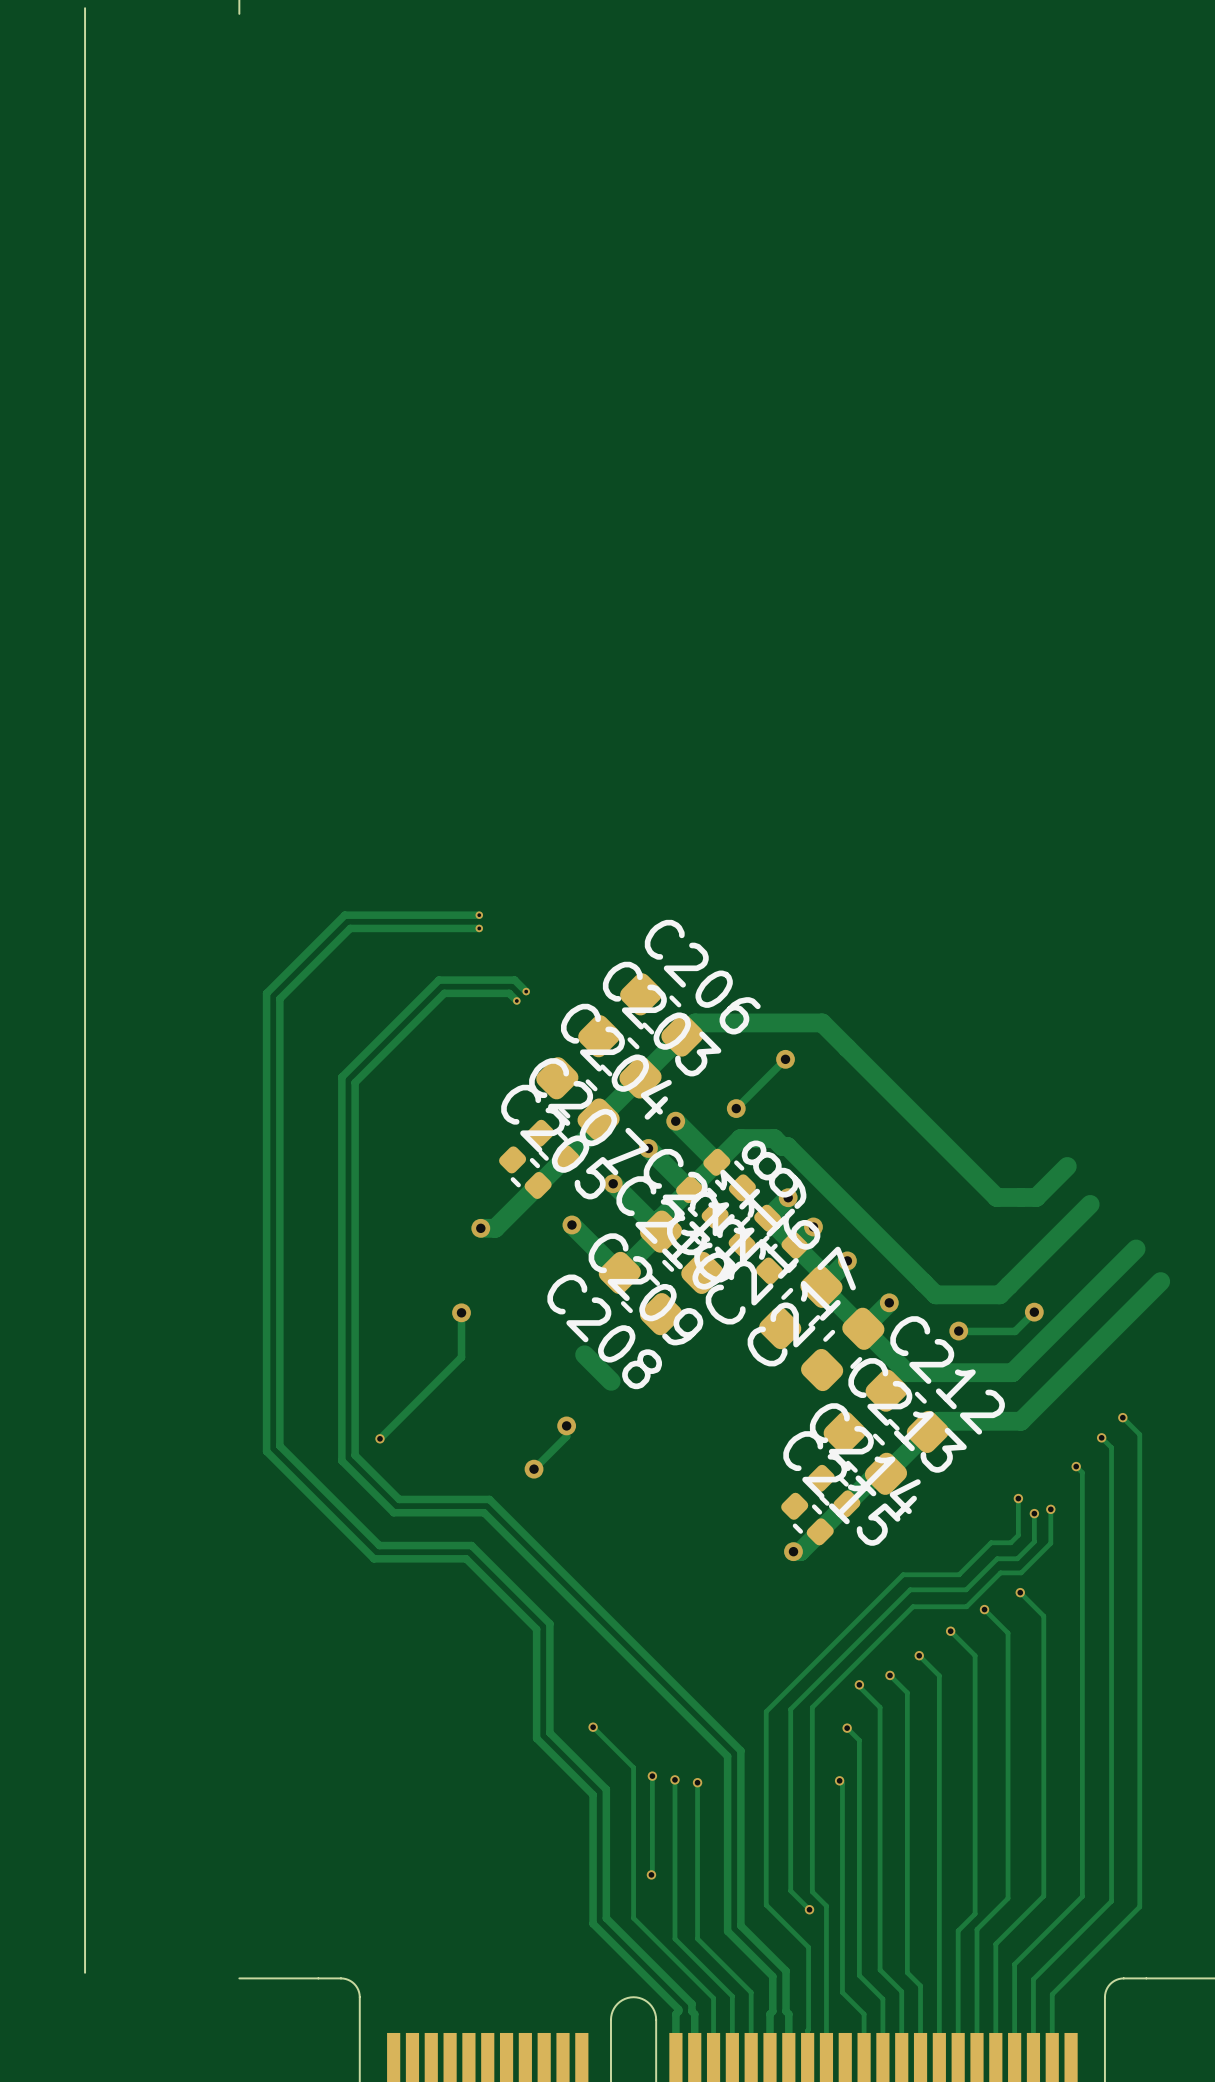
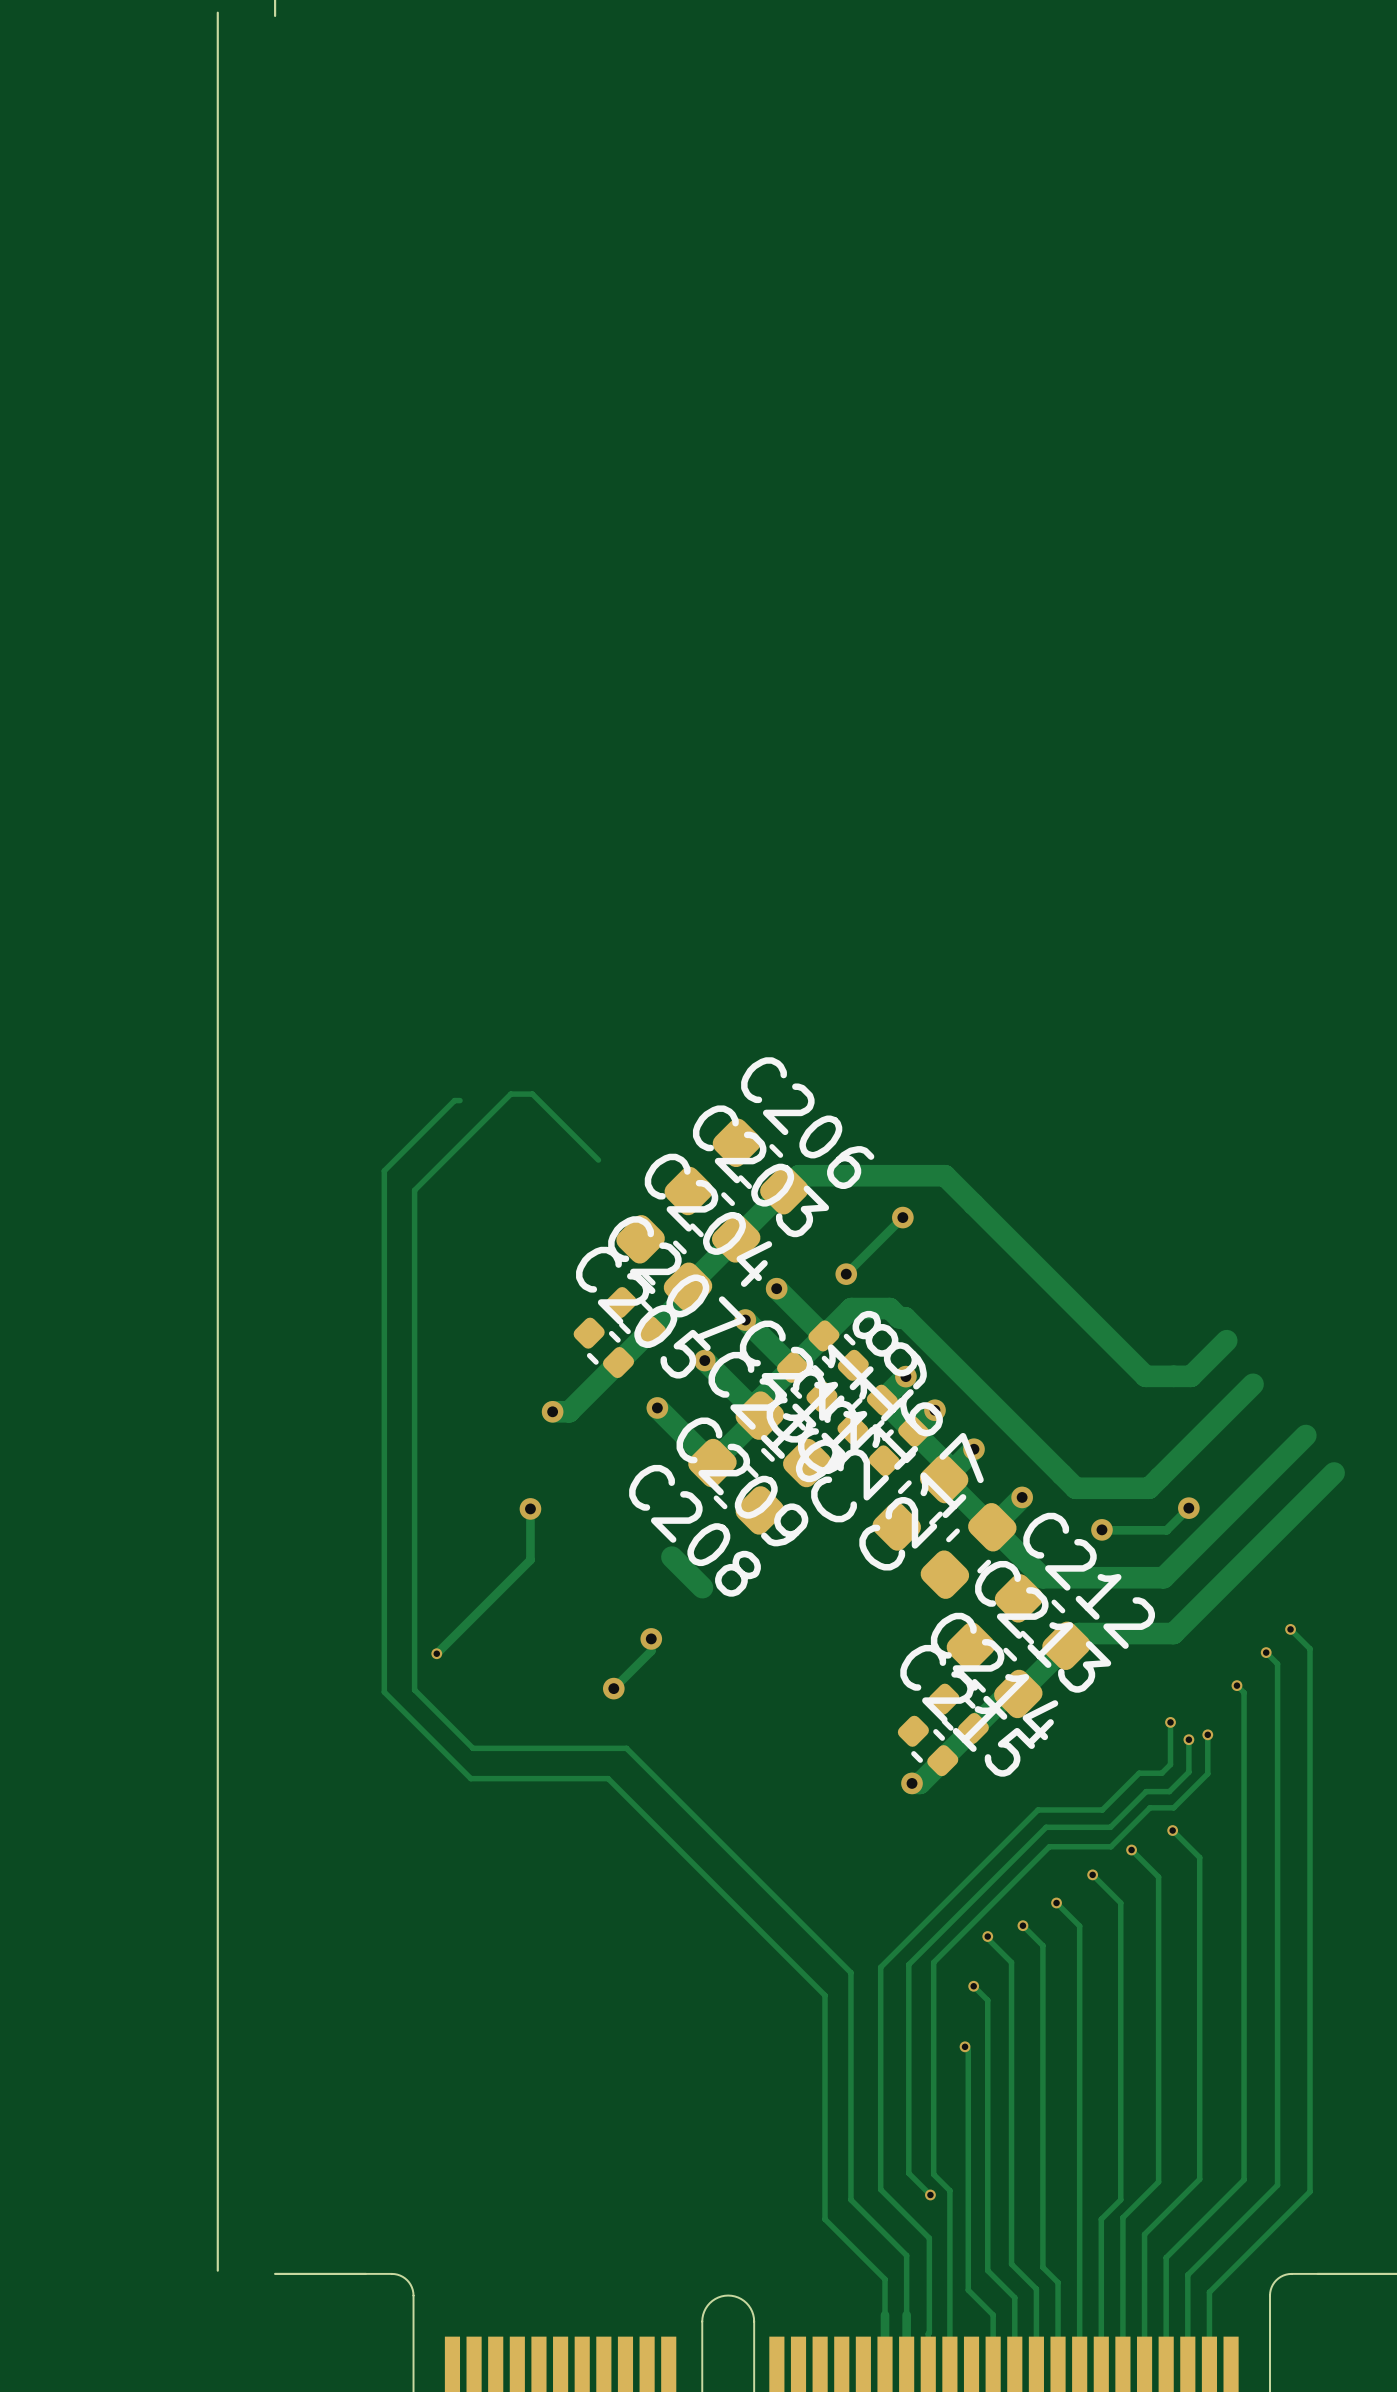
board edge: (85, 8) (85, 1972) -> (217, 12) (217, 2270)
track: (479, 915) (344, 915) (266, 993) (266, 1451) (373, 1558) (466, 1558) (536, 1629) (536, 1738) (593, 1794) (593, 1923) (678, 2009) (675, 2014) (675, 2070) -> none
via: (479, 915) -> none
track: (479, 928) (350, 928) (279, 998) (279, 1445) (379, 1545) (471, 1545) (549, 1623) (549, 1732) (606, 1789) (606, 1918) (691, 2003) (691, 2011) (694, 2014) (694, 2070) -> none
via: (479, 928) -> none
track: (526, 991) (514, 980) (438, 980) (341, 1077) (341, 1460) (393, 1512) (484, 1512) (727, 1756) (727, 1931) (772, 1976) (772, 2011) (770, 2014) -> (460, 1100) (454, 1100) (384, 1170) (384, 1692) (470, 1778) (608, 1778) (824, 1995) (824, 2219) (885, 2279) (885, 2315)
via: (526, 991) -> none
track: (516, 1000) (509, 993) (444, 993) (355, 1082) (355, 1455) (399, 1499) (489, 1499) (740, 1750) (740, 1925) (786, 1970) (786, 2011) (788, 2014) -> (598, 1160) (532, 1094) (510, 1094) (414, 1190) (414, 1689) (473, 1748) (626, 1748) (850, 1972) (850, 2199) (906, 2255) (906, 2315)
via: (516, 1000) -> none
track: (593, 1727) (633, 1767) (633, 1918) (713, 1998) (713, 2070) -> none
via: (593, 1727) -> none
track: (652, 1776) (651, 1874) -> none
via: (652, 1776) -> none
track: (674, 1779) (674, 1938) (732, 1996) (732, 2070) -> none
via: (674, 1779) -> none
track: (697, 1782) (697, 1938) (751, 1992) (751, 2070) -> none
via: (697, 1782) -> none
via: (651, 1874) -> none

